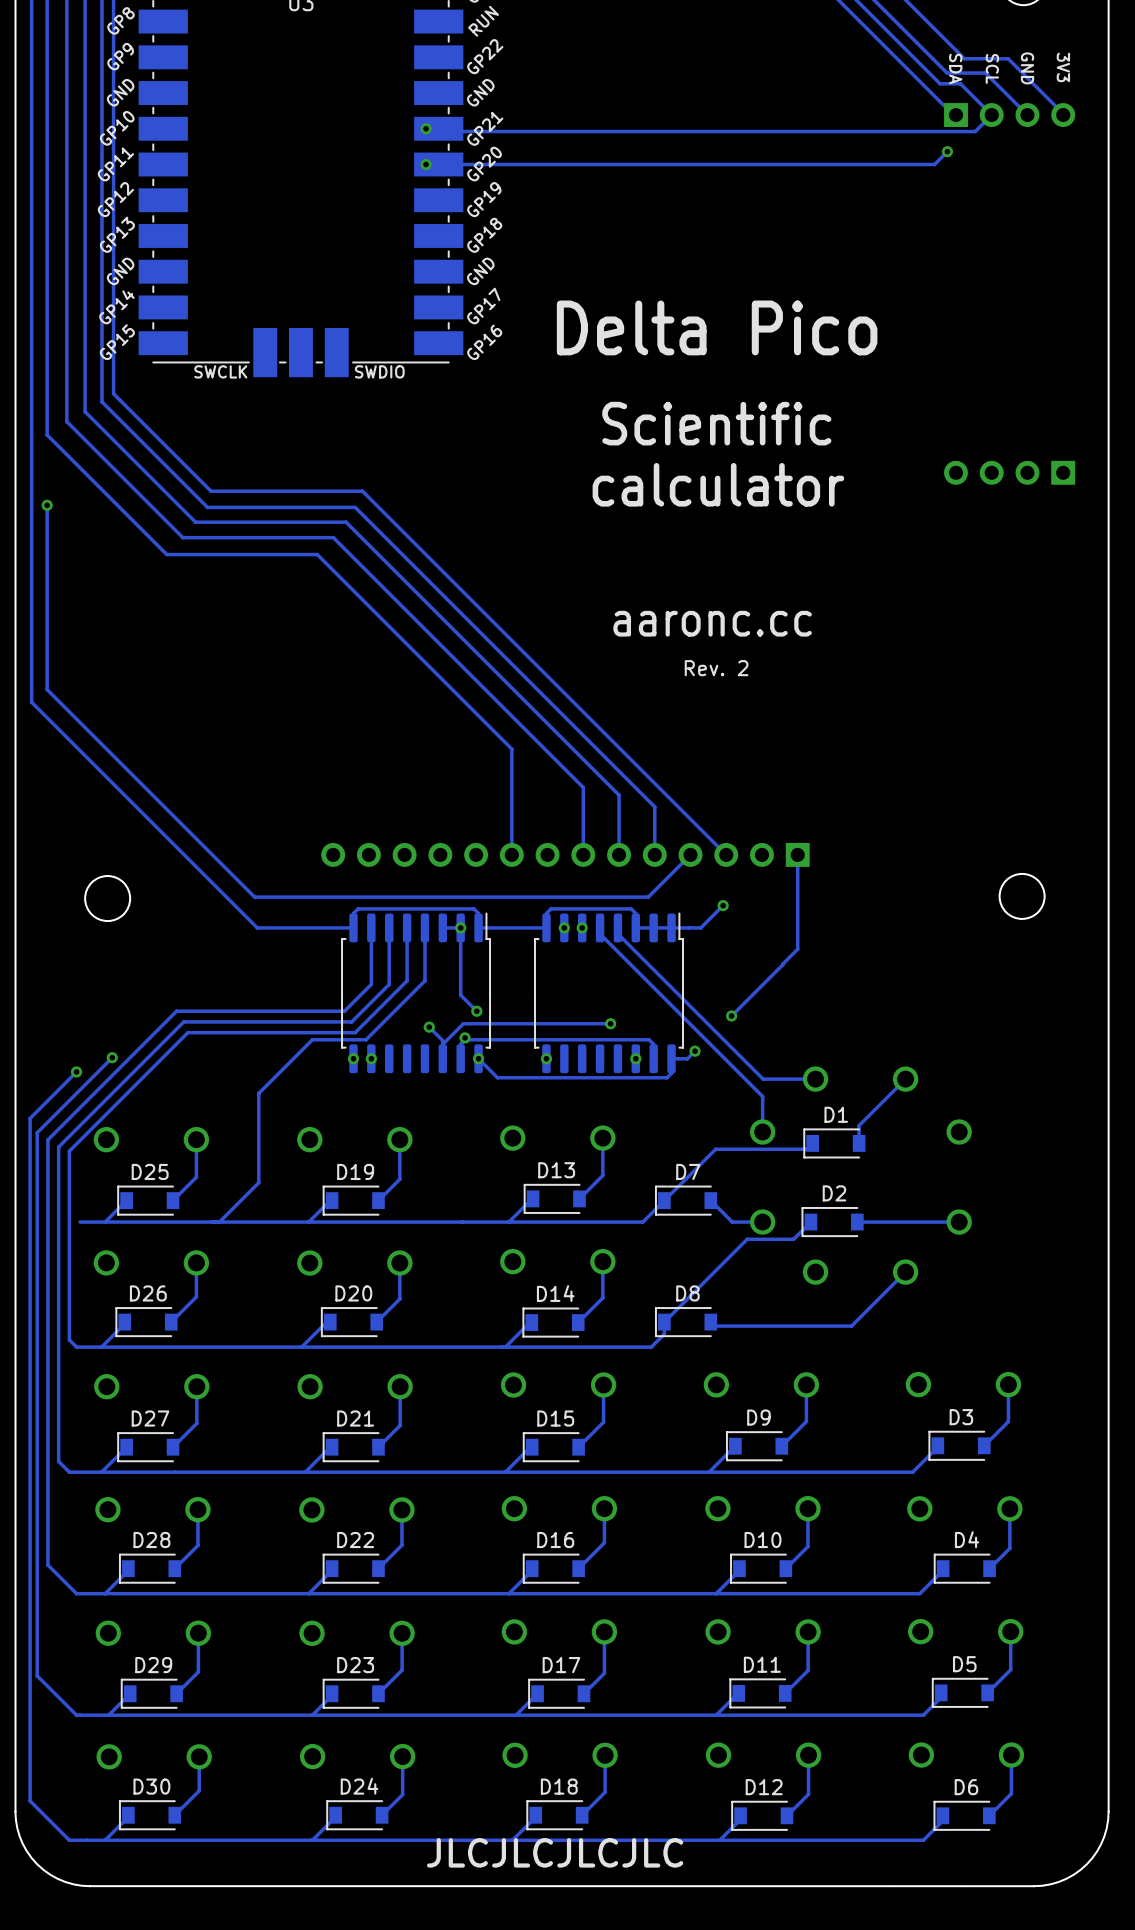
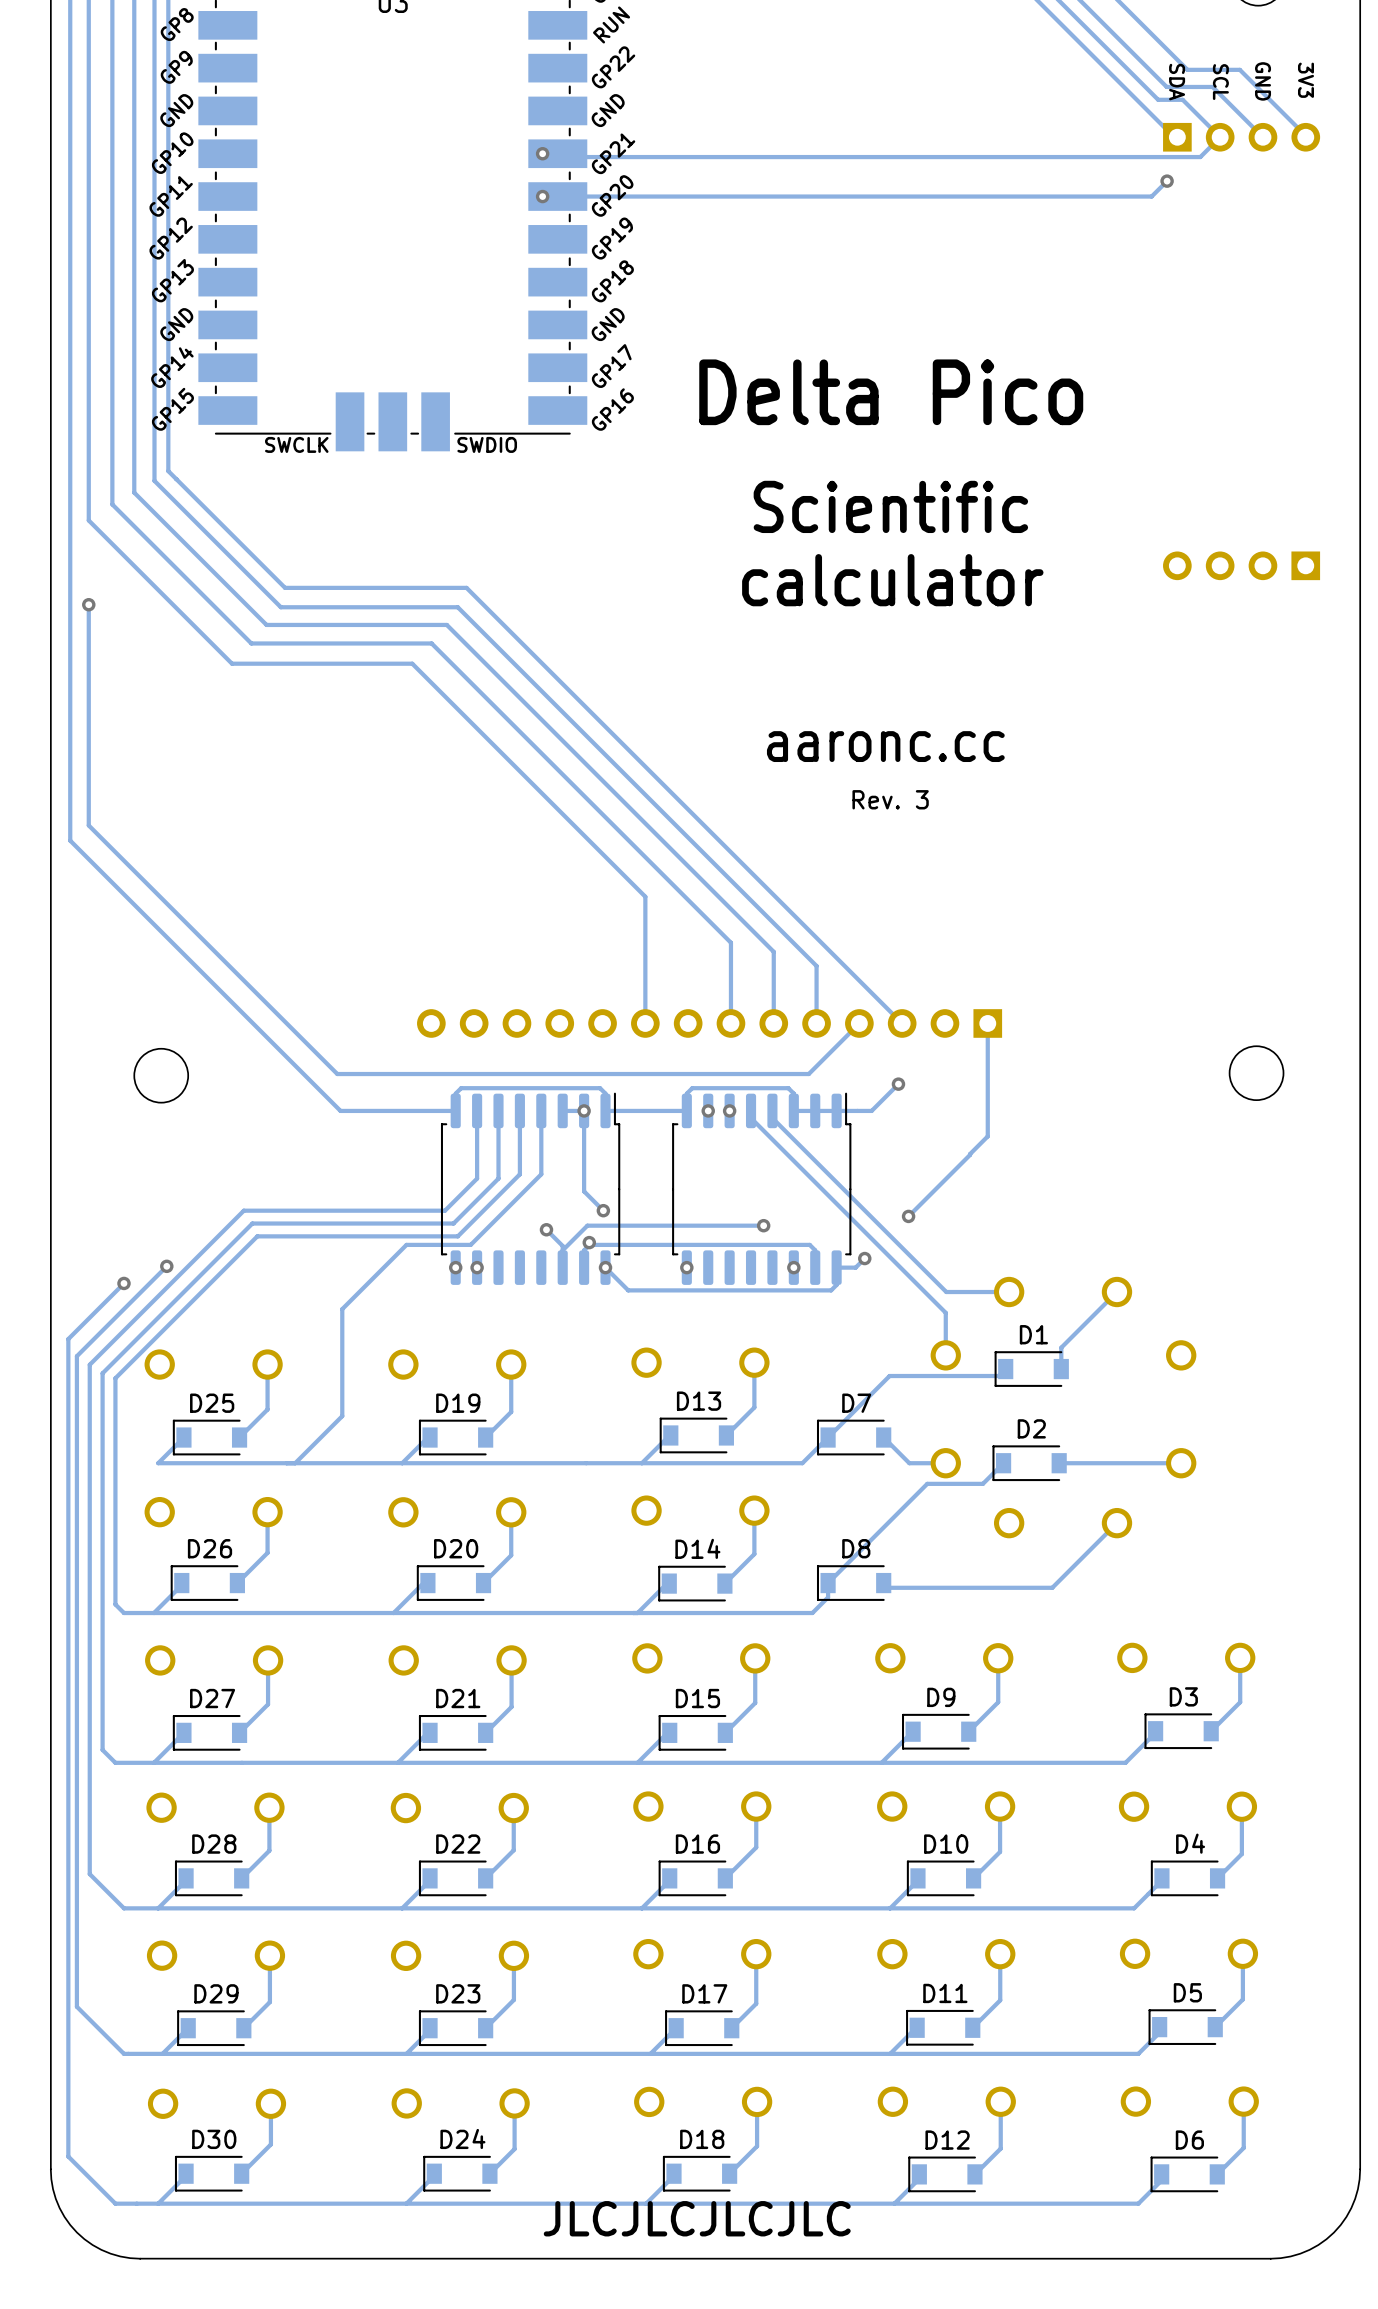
text: Rev. 2 (716, 668) -> Rev. 3 (890, 799)
track: (105, 1222) (80, 1222) -> none

